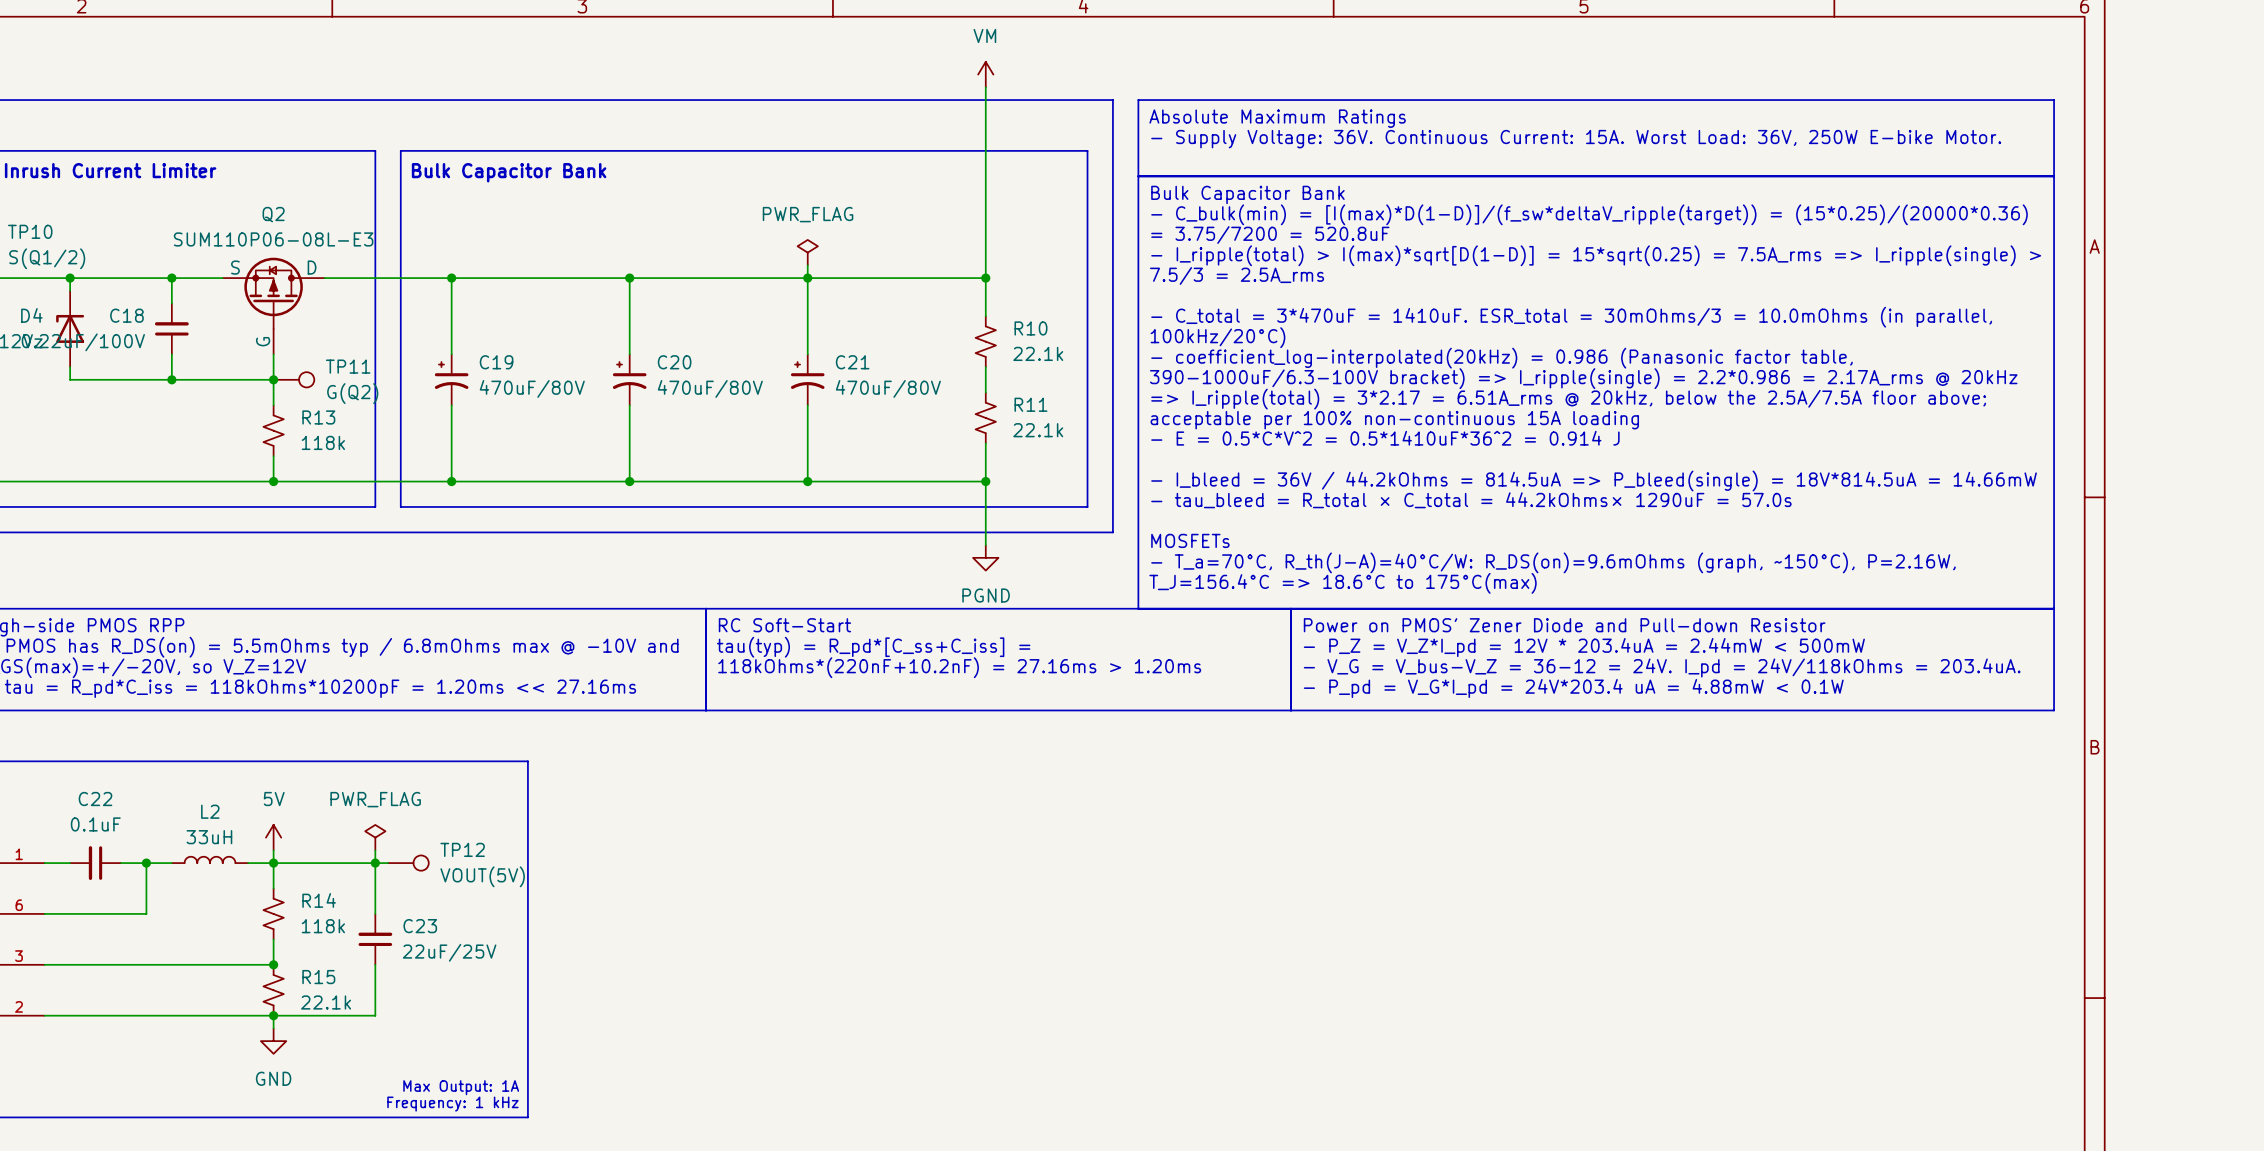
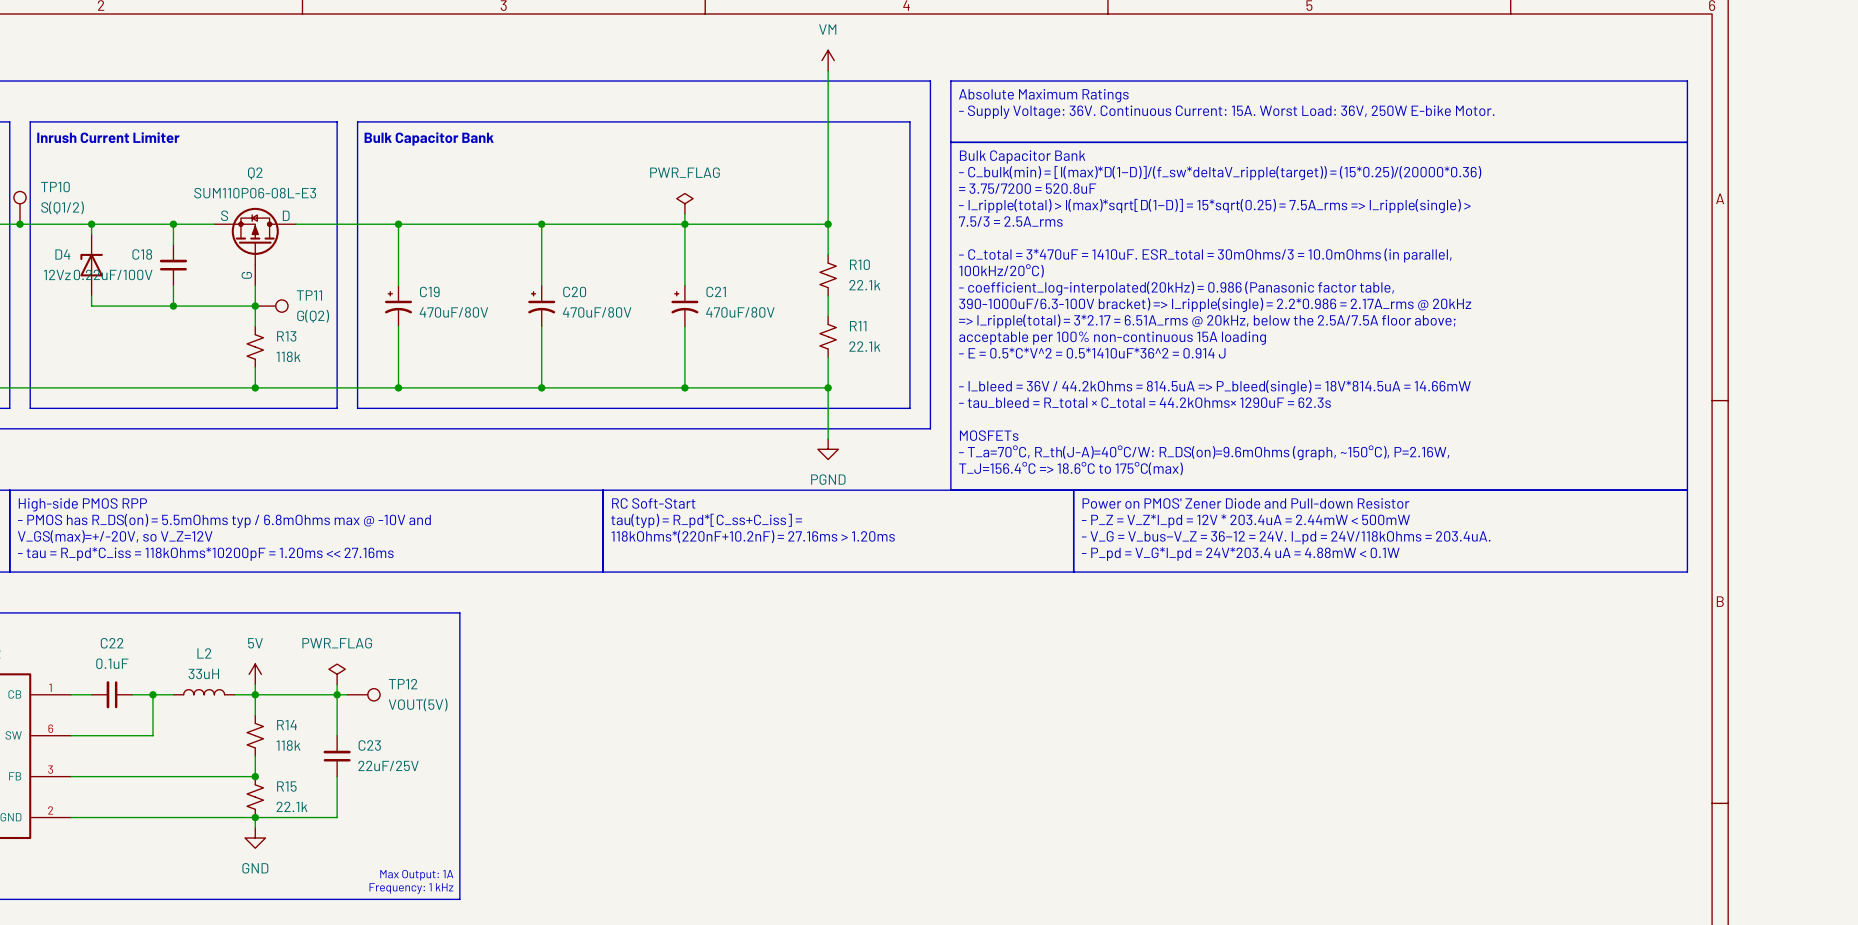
text: - tau_bleed = R_total × C_total = 44.2kOhms× 1290uF = 57.0s (1471, 500) -> - tau_bleed = R_total × C_total = 44.2kOhms× 1290uF = 62.3s (1144, 402)

